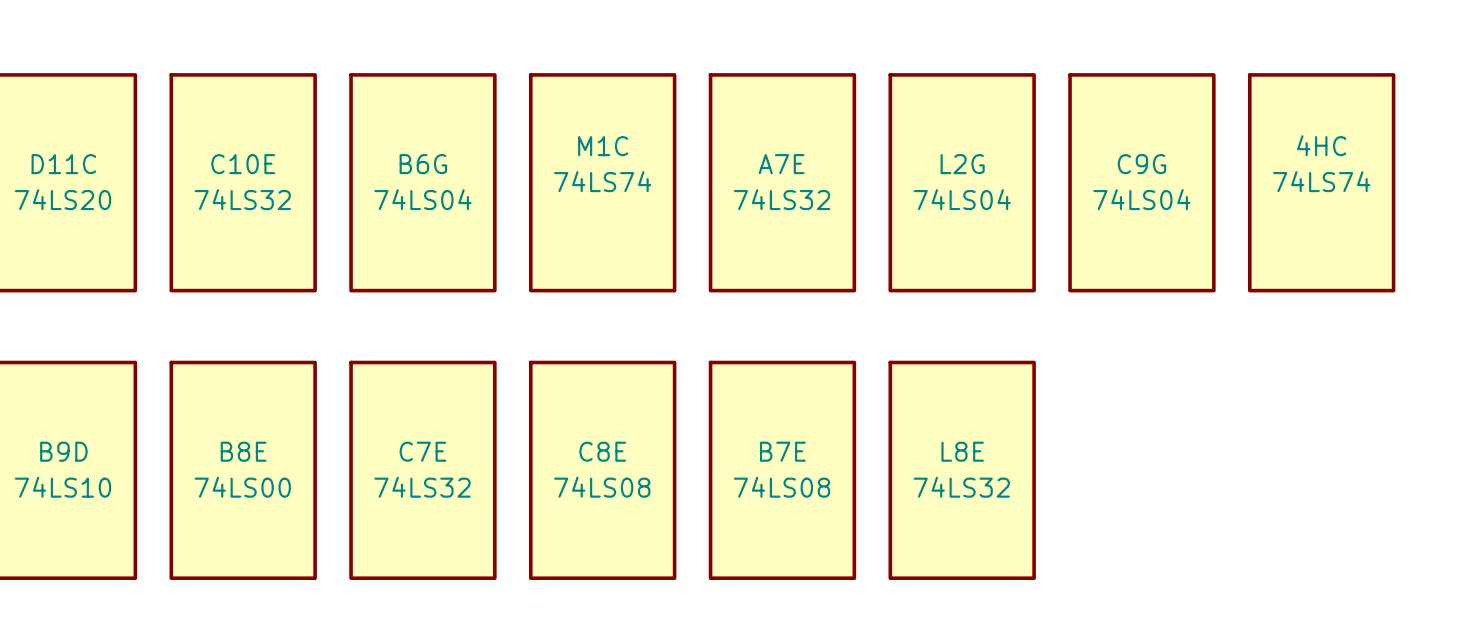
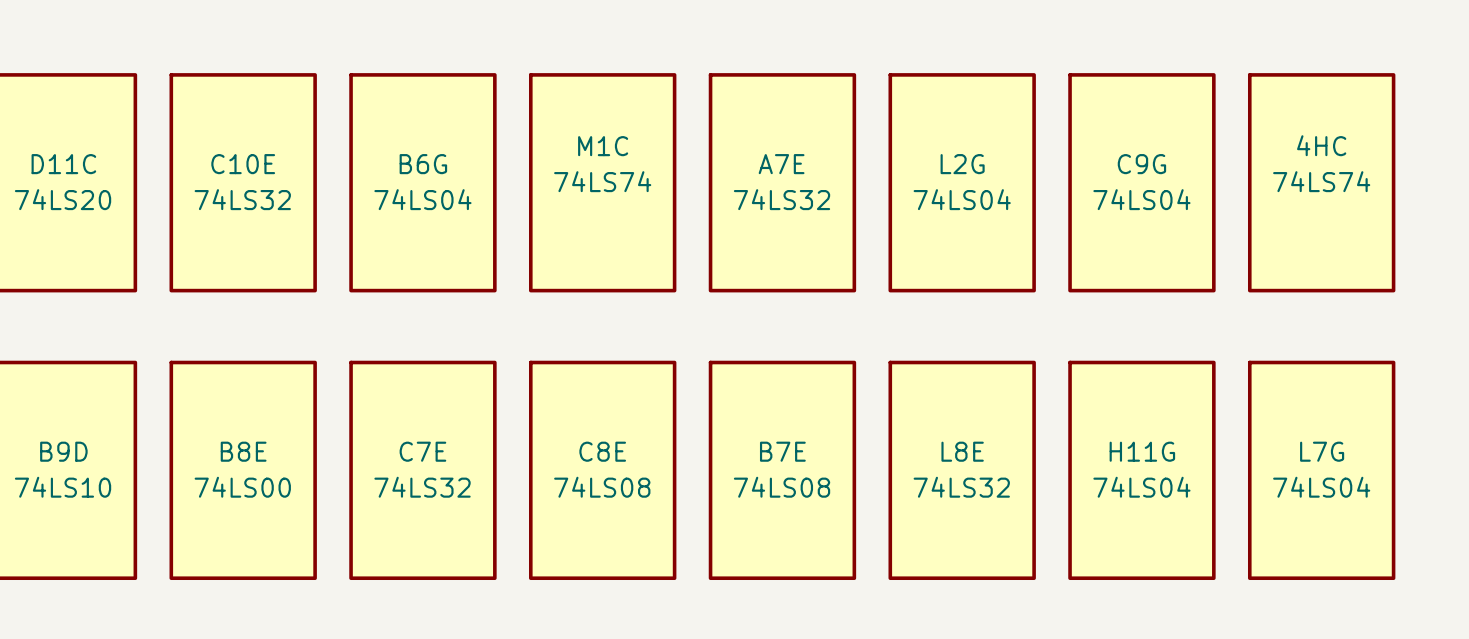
H11G: none -> 74LS04 (1141, 470)
L7G: none -> 74LS04 (1321, 470)

